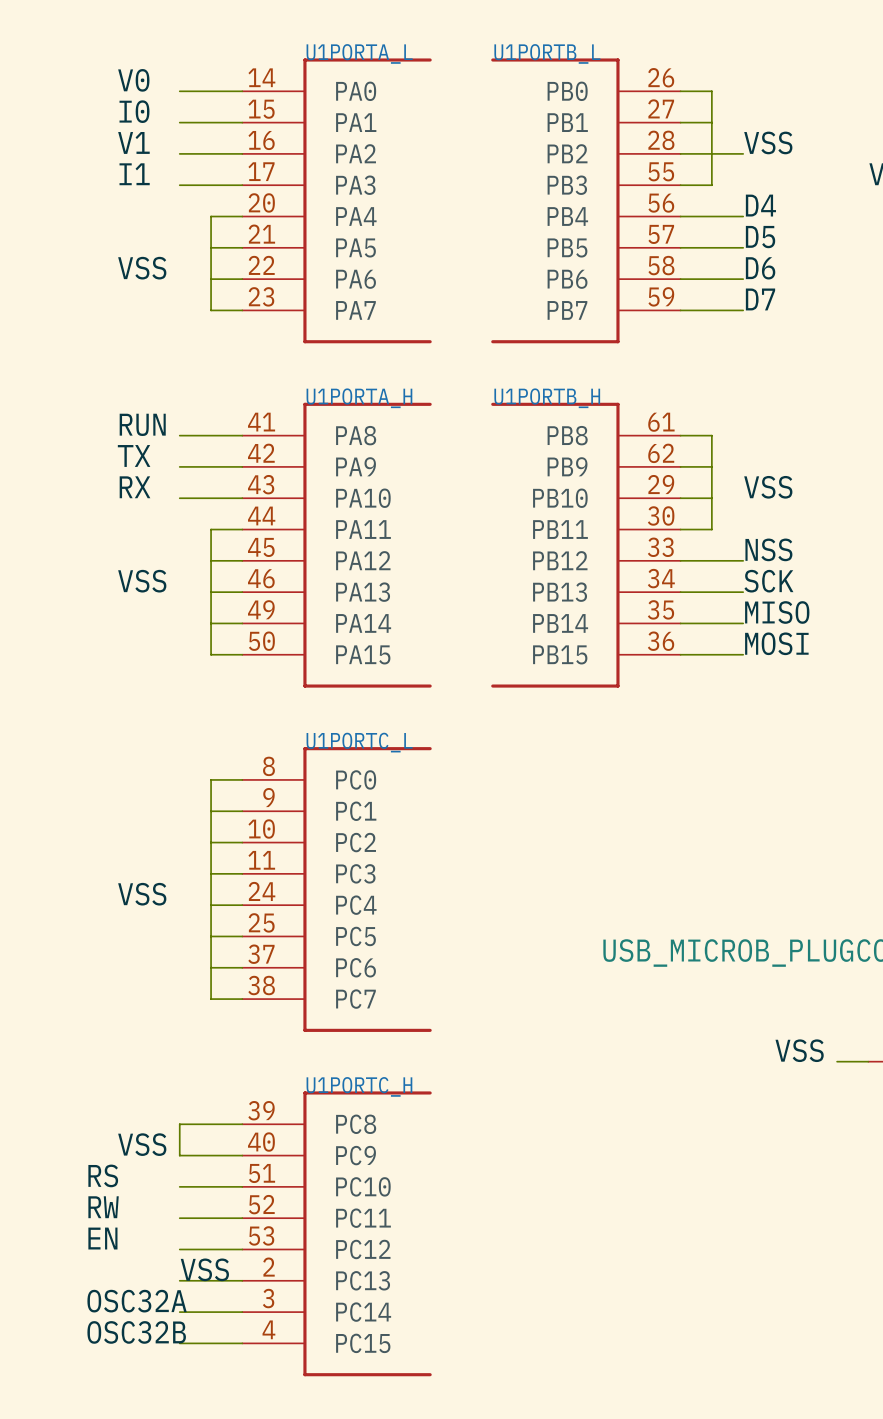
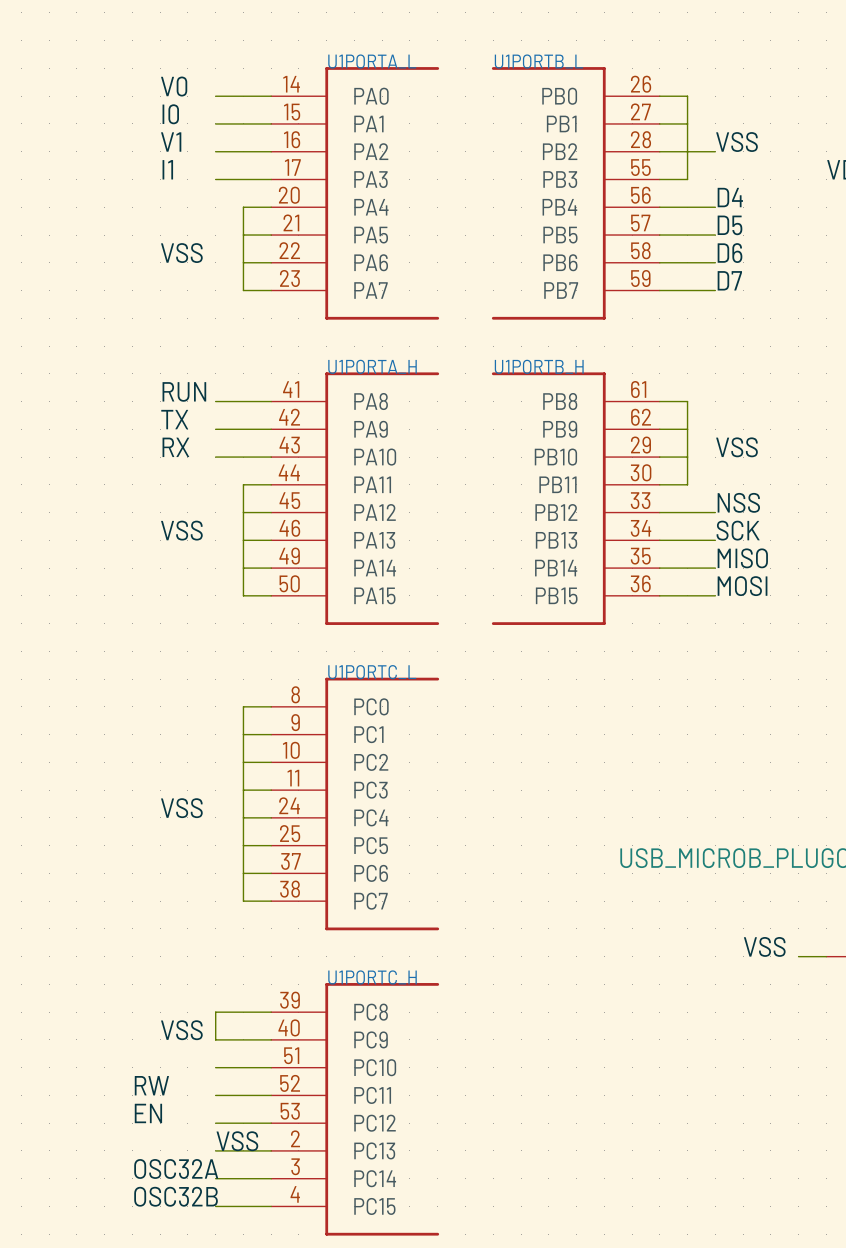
label: RS (103, 1175) -> none

